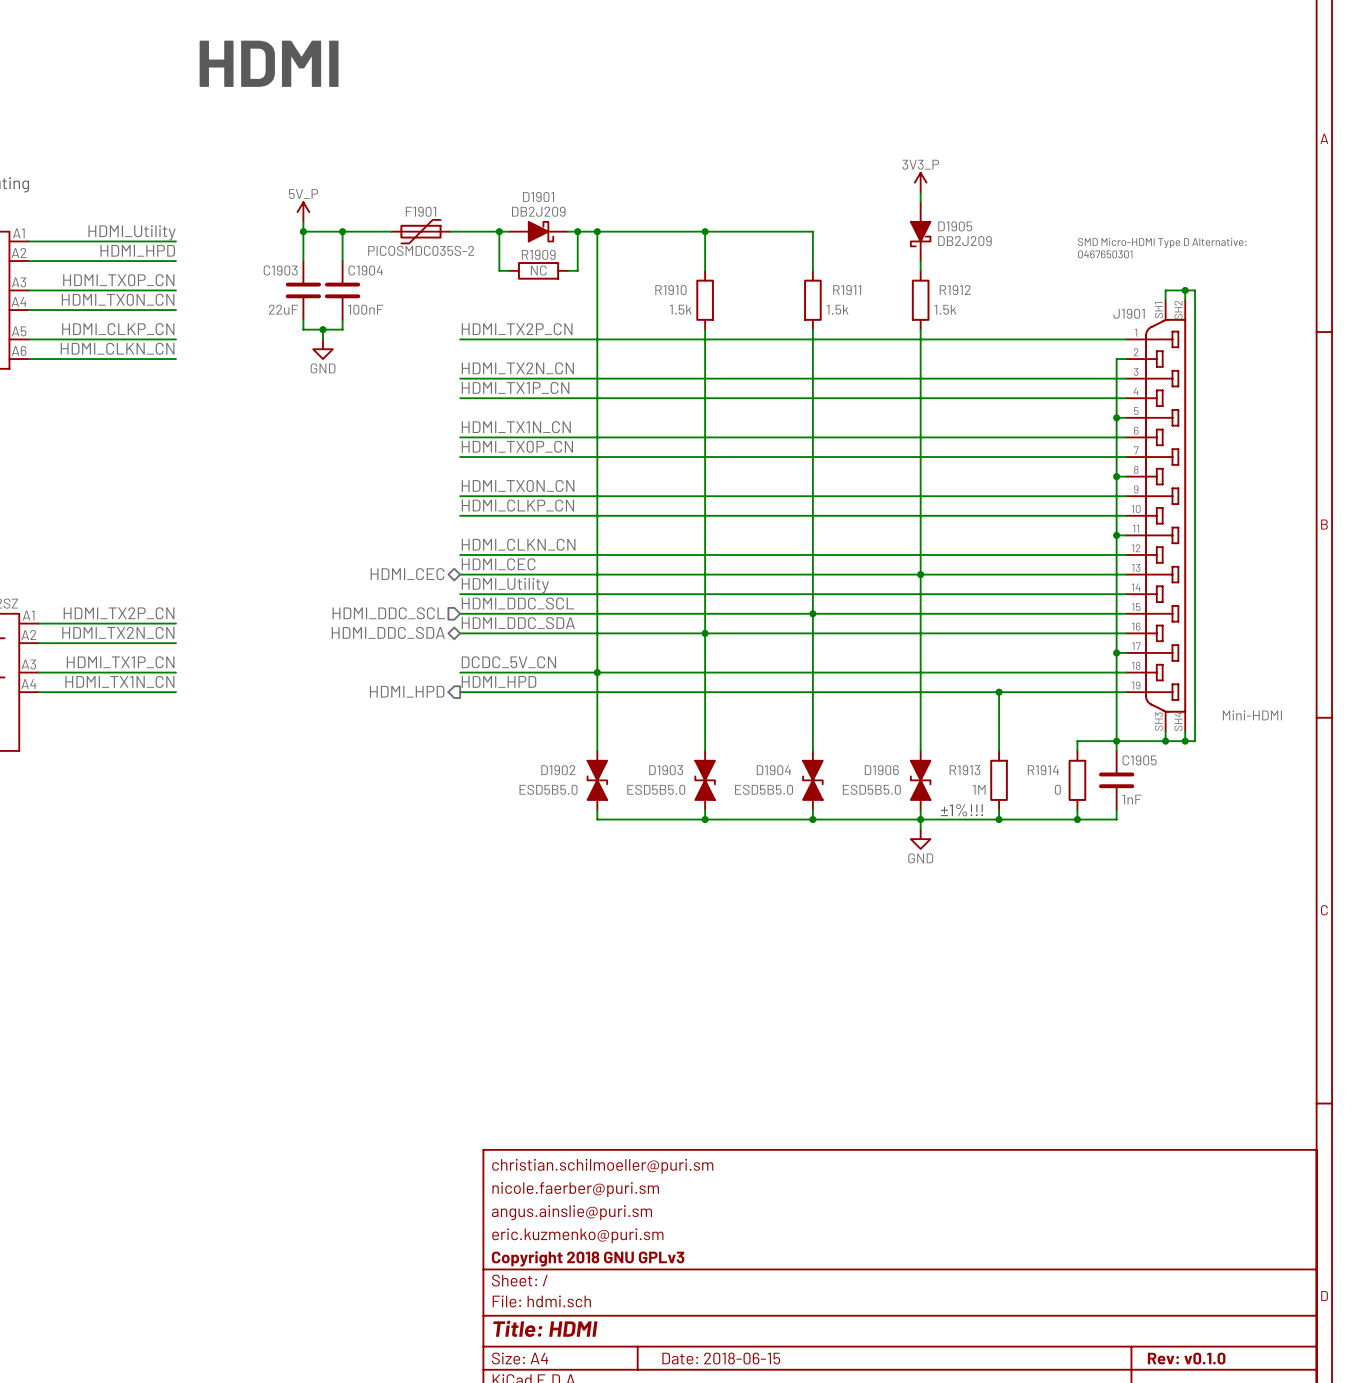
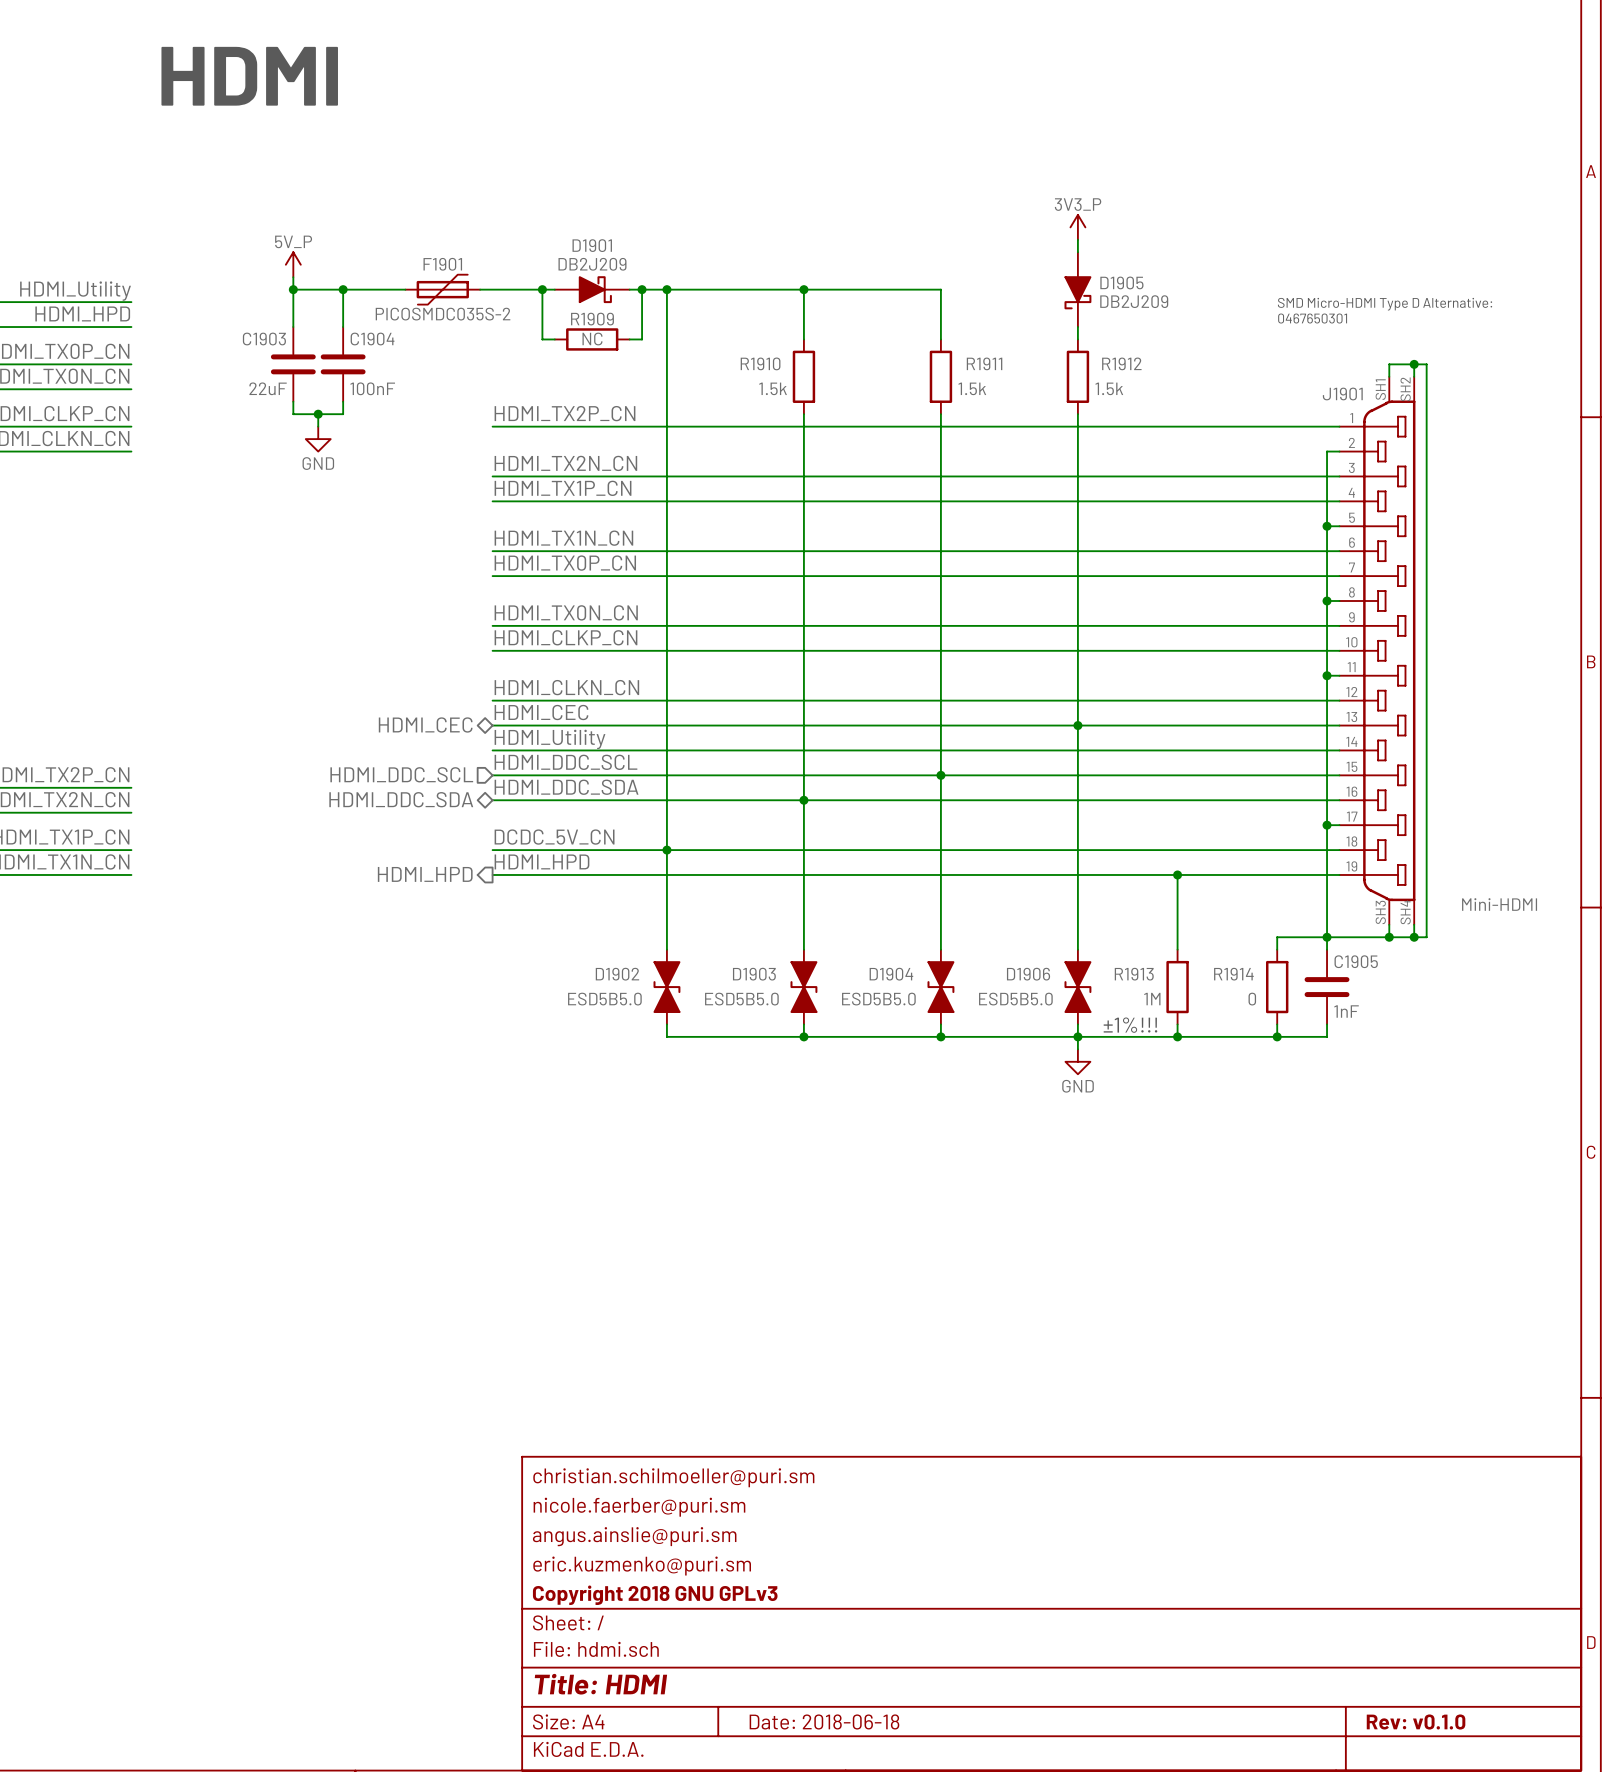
title block: Date: 2018-06-15 (721, 1358) -> Date: 2018-06-18 (824, 1721)

